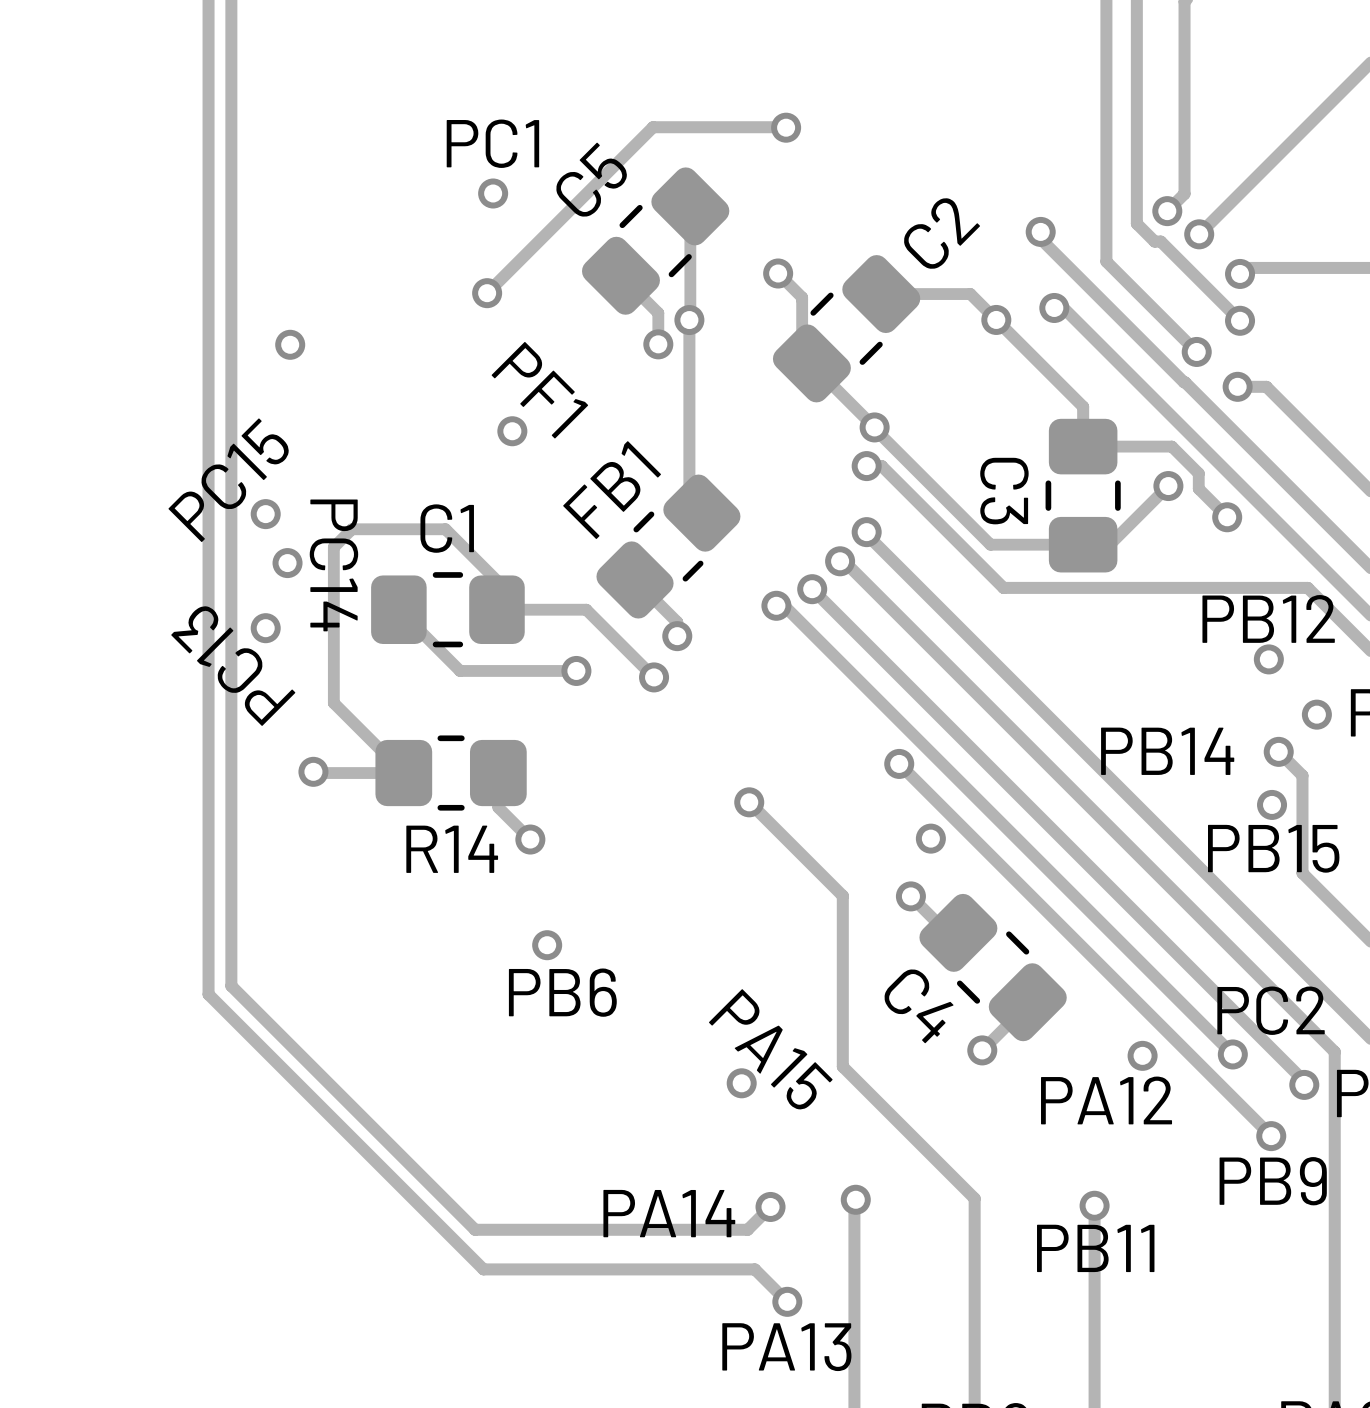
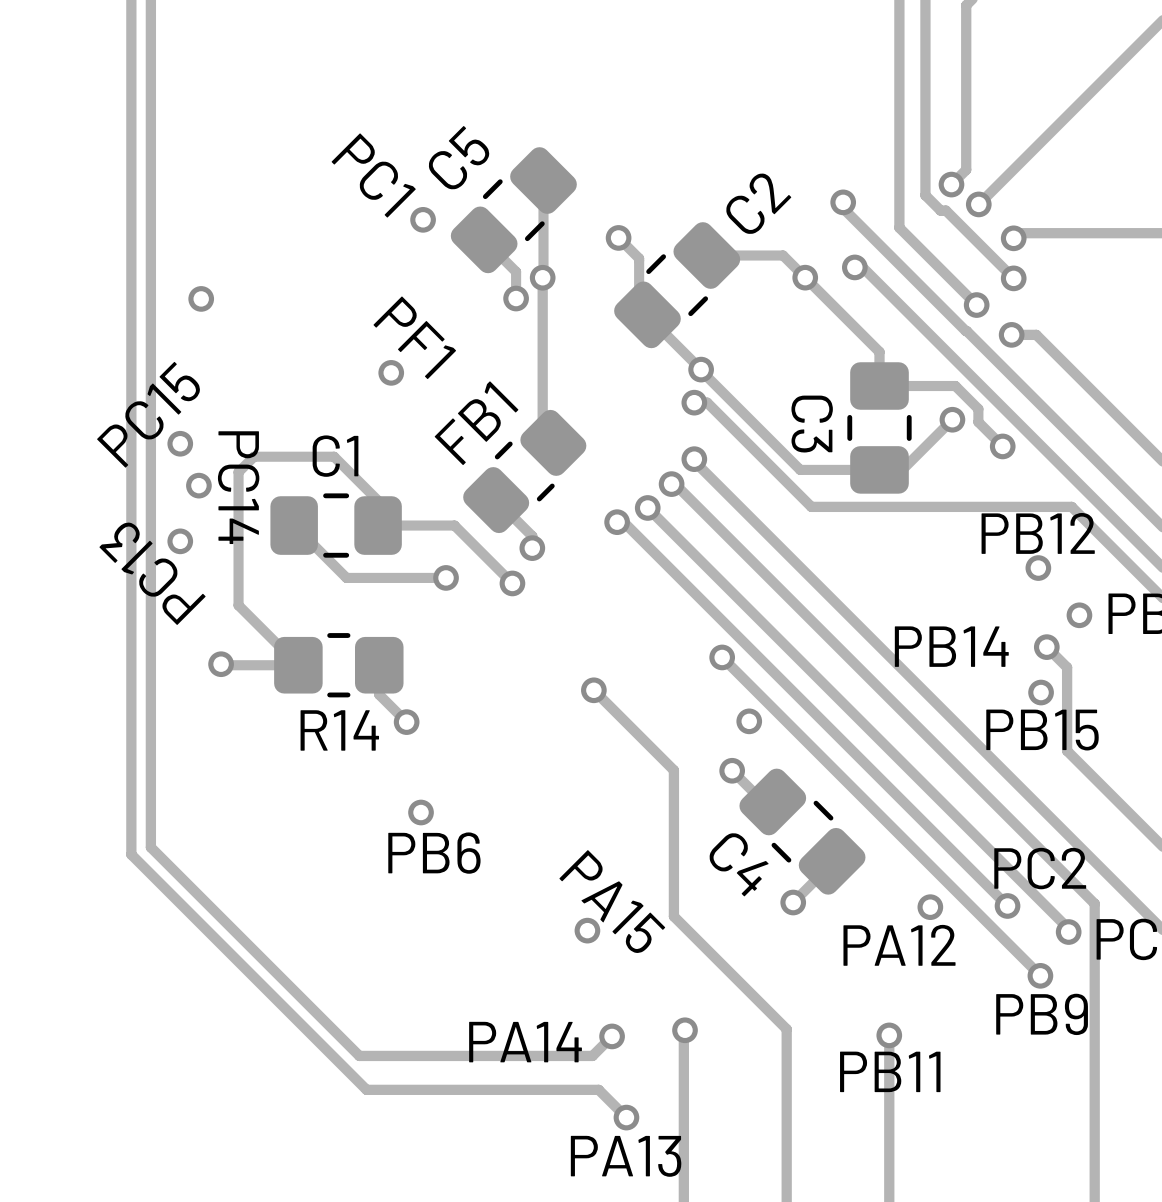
track: (785, 127) (653, 127) (487, 293) -> none
via: (786, 127) -> none
text rotation: 0° (492, 143) -> 45° clockwise (373, 175)
via: (493, 193) -> none
via: none -> (423, 219)
via: (487, 293) -> none

